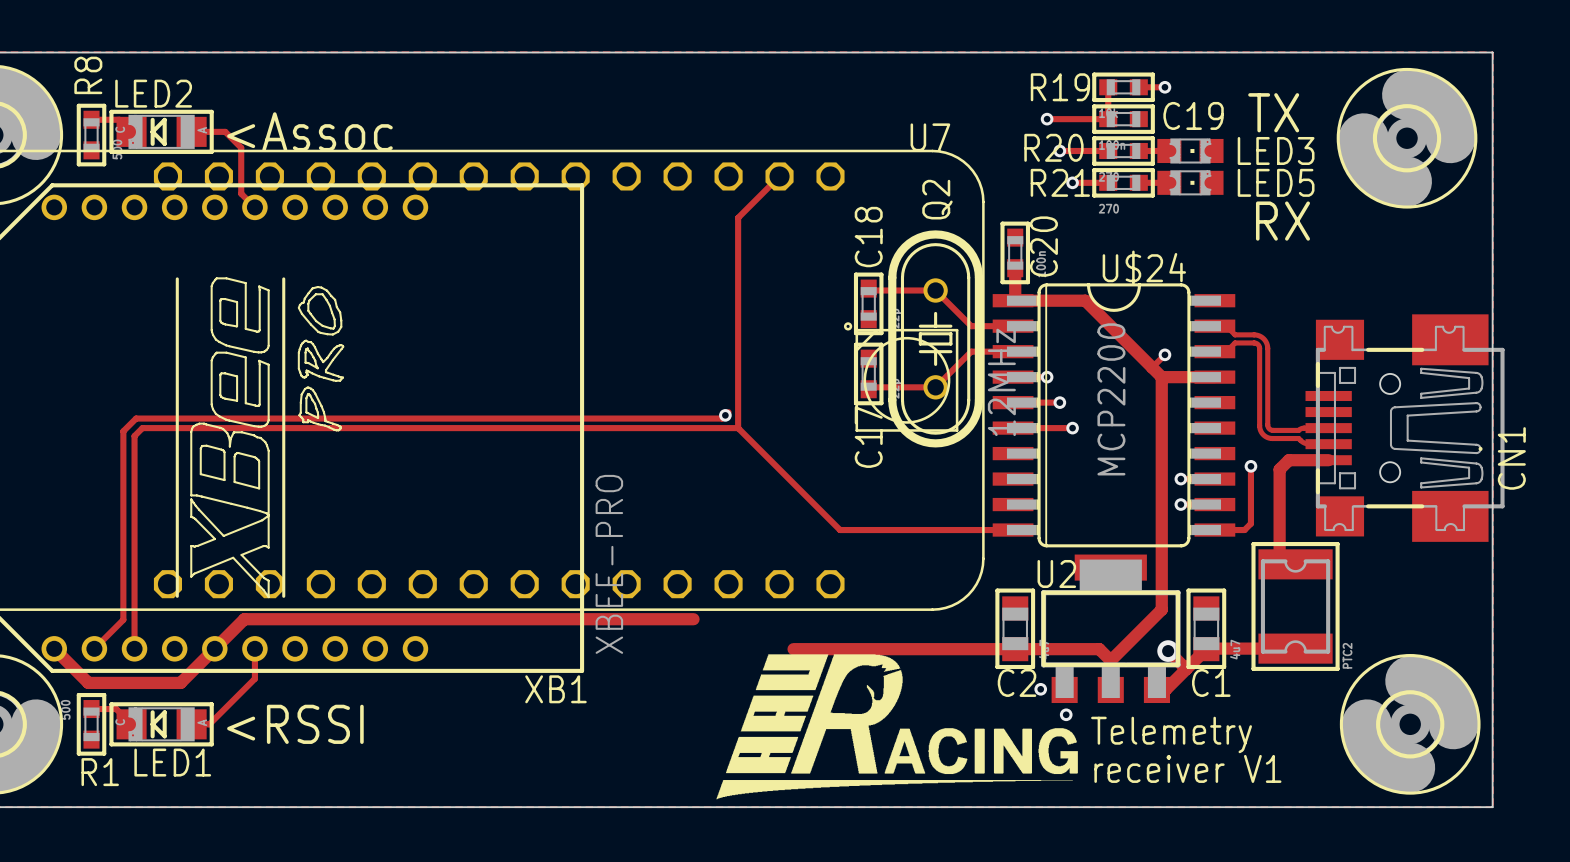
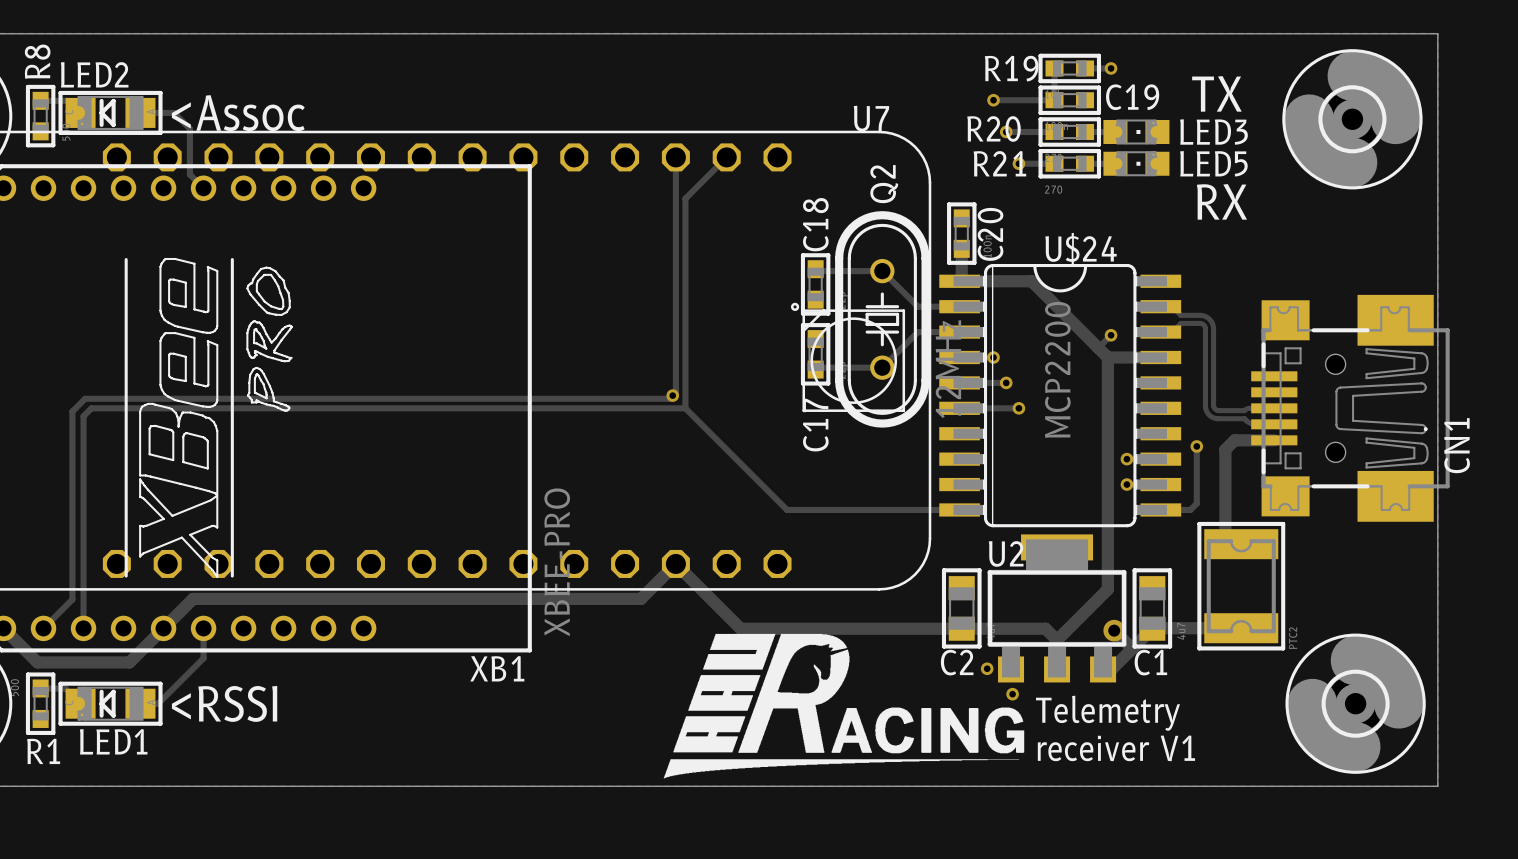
track: none -> (675, 157) (675, 392)
track: none -> (640, 598) (675, 563) (740, 628)

